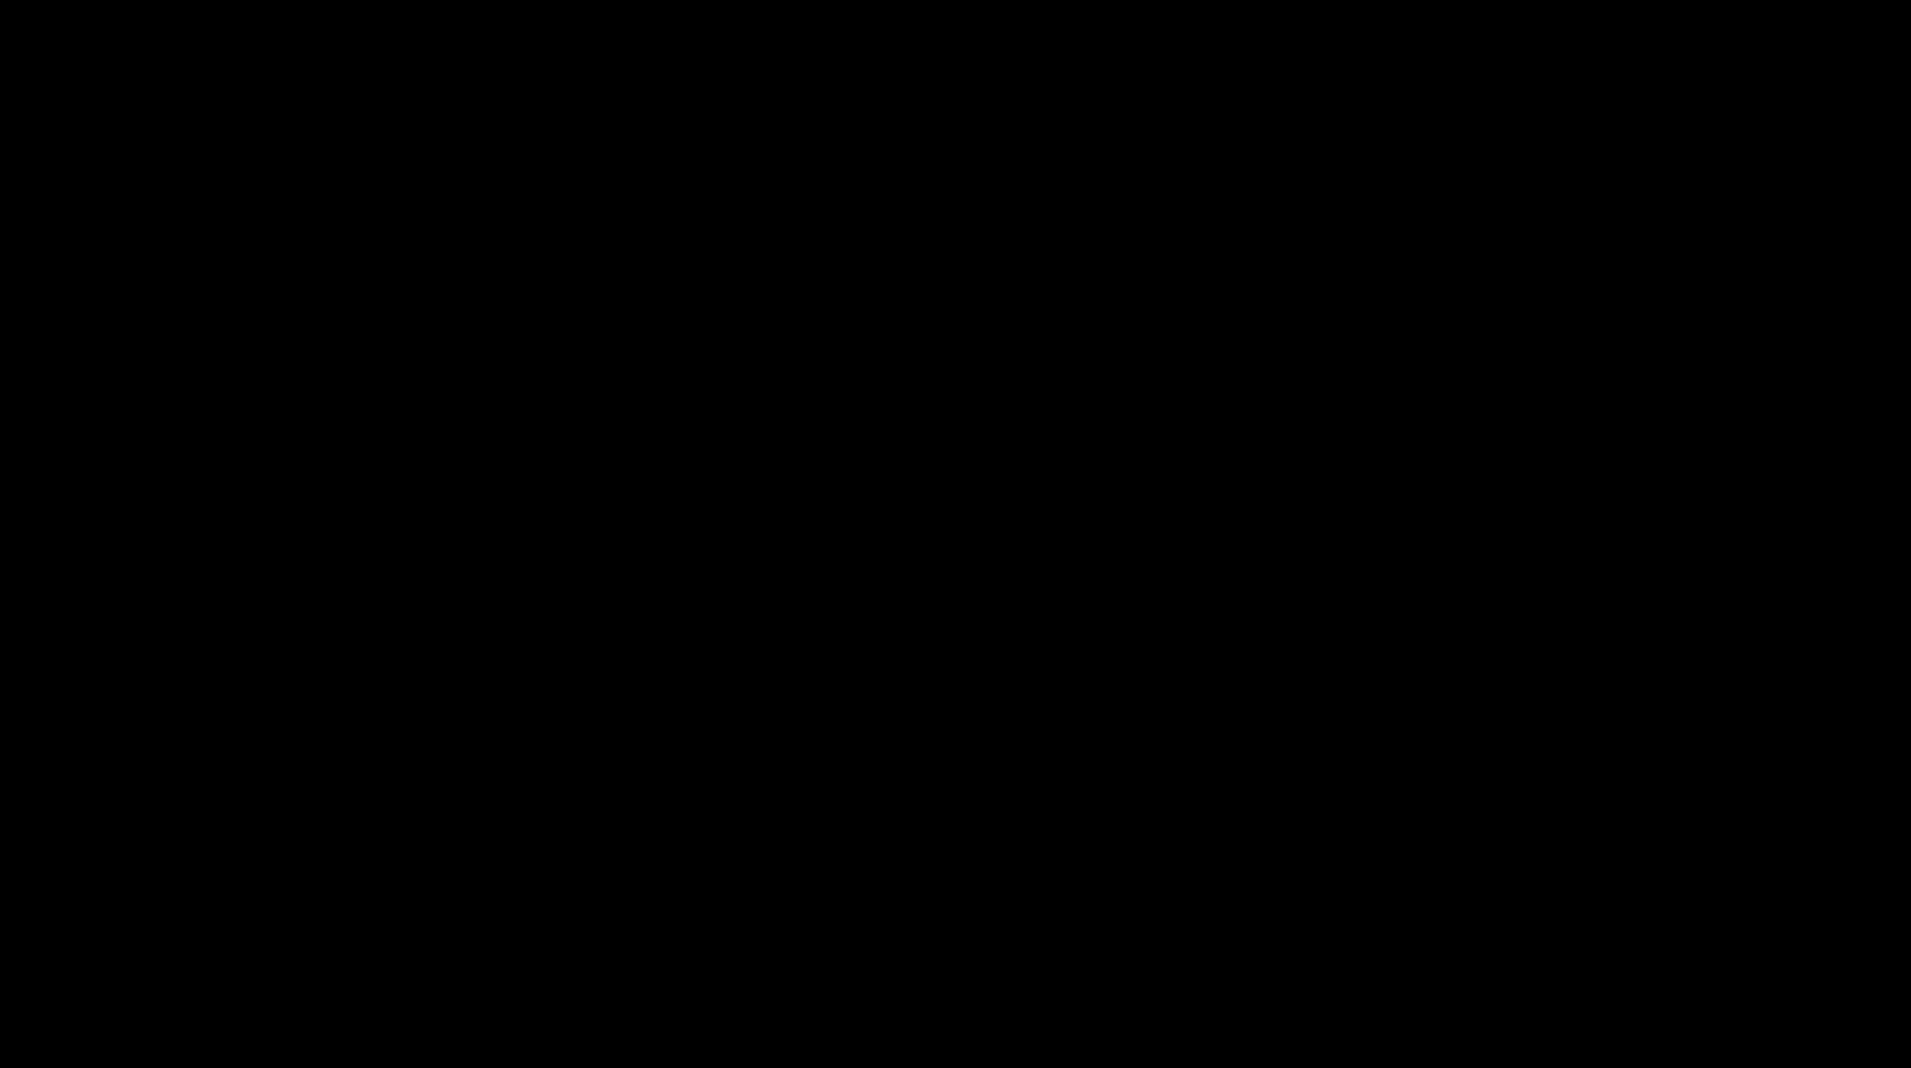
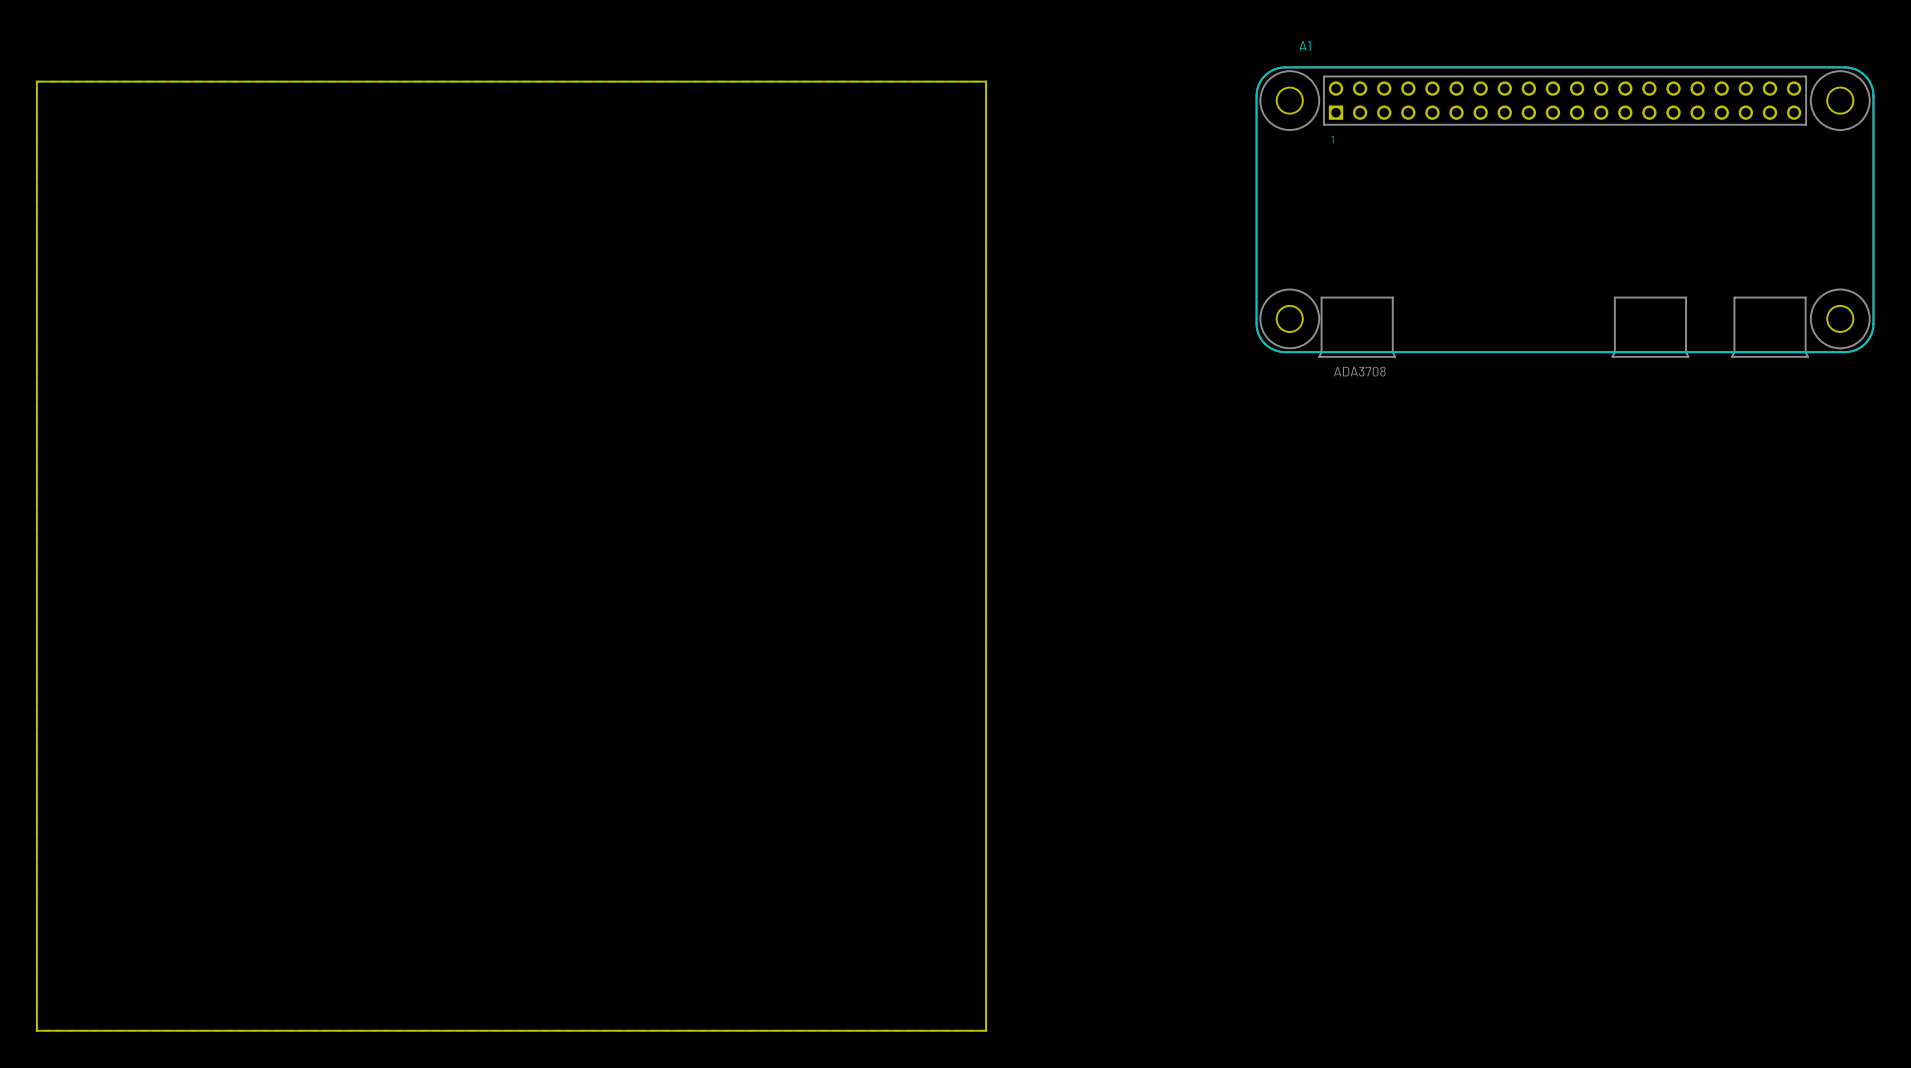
board edge: none -> (36, 81) (986, 81) (986, 1030) (36, 1030) (36, 81)
A1: none -> ADA3708 (1565, 212)

